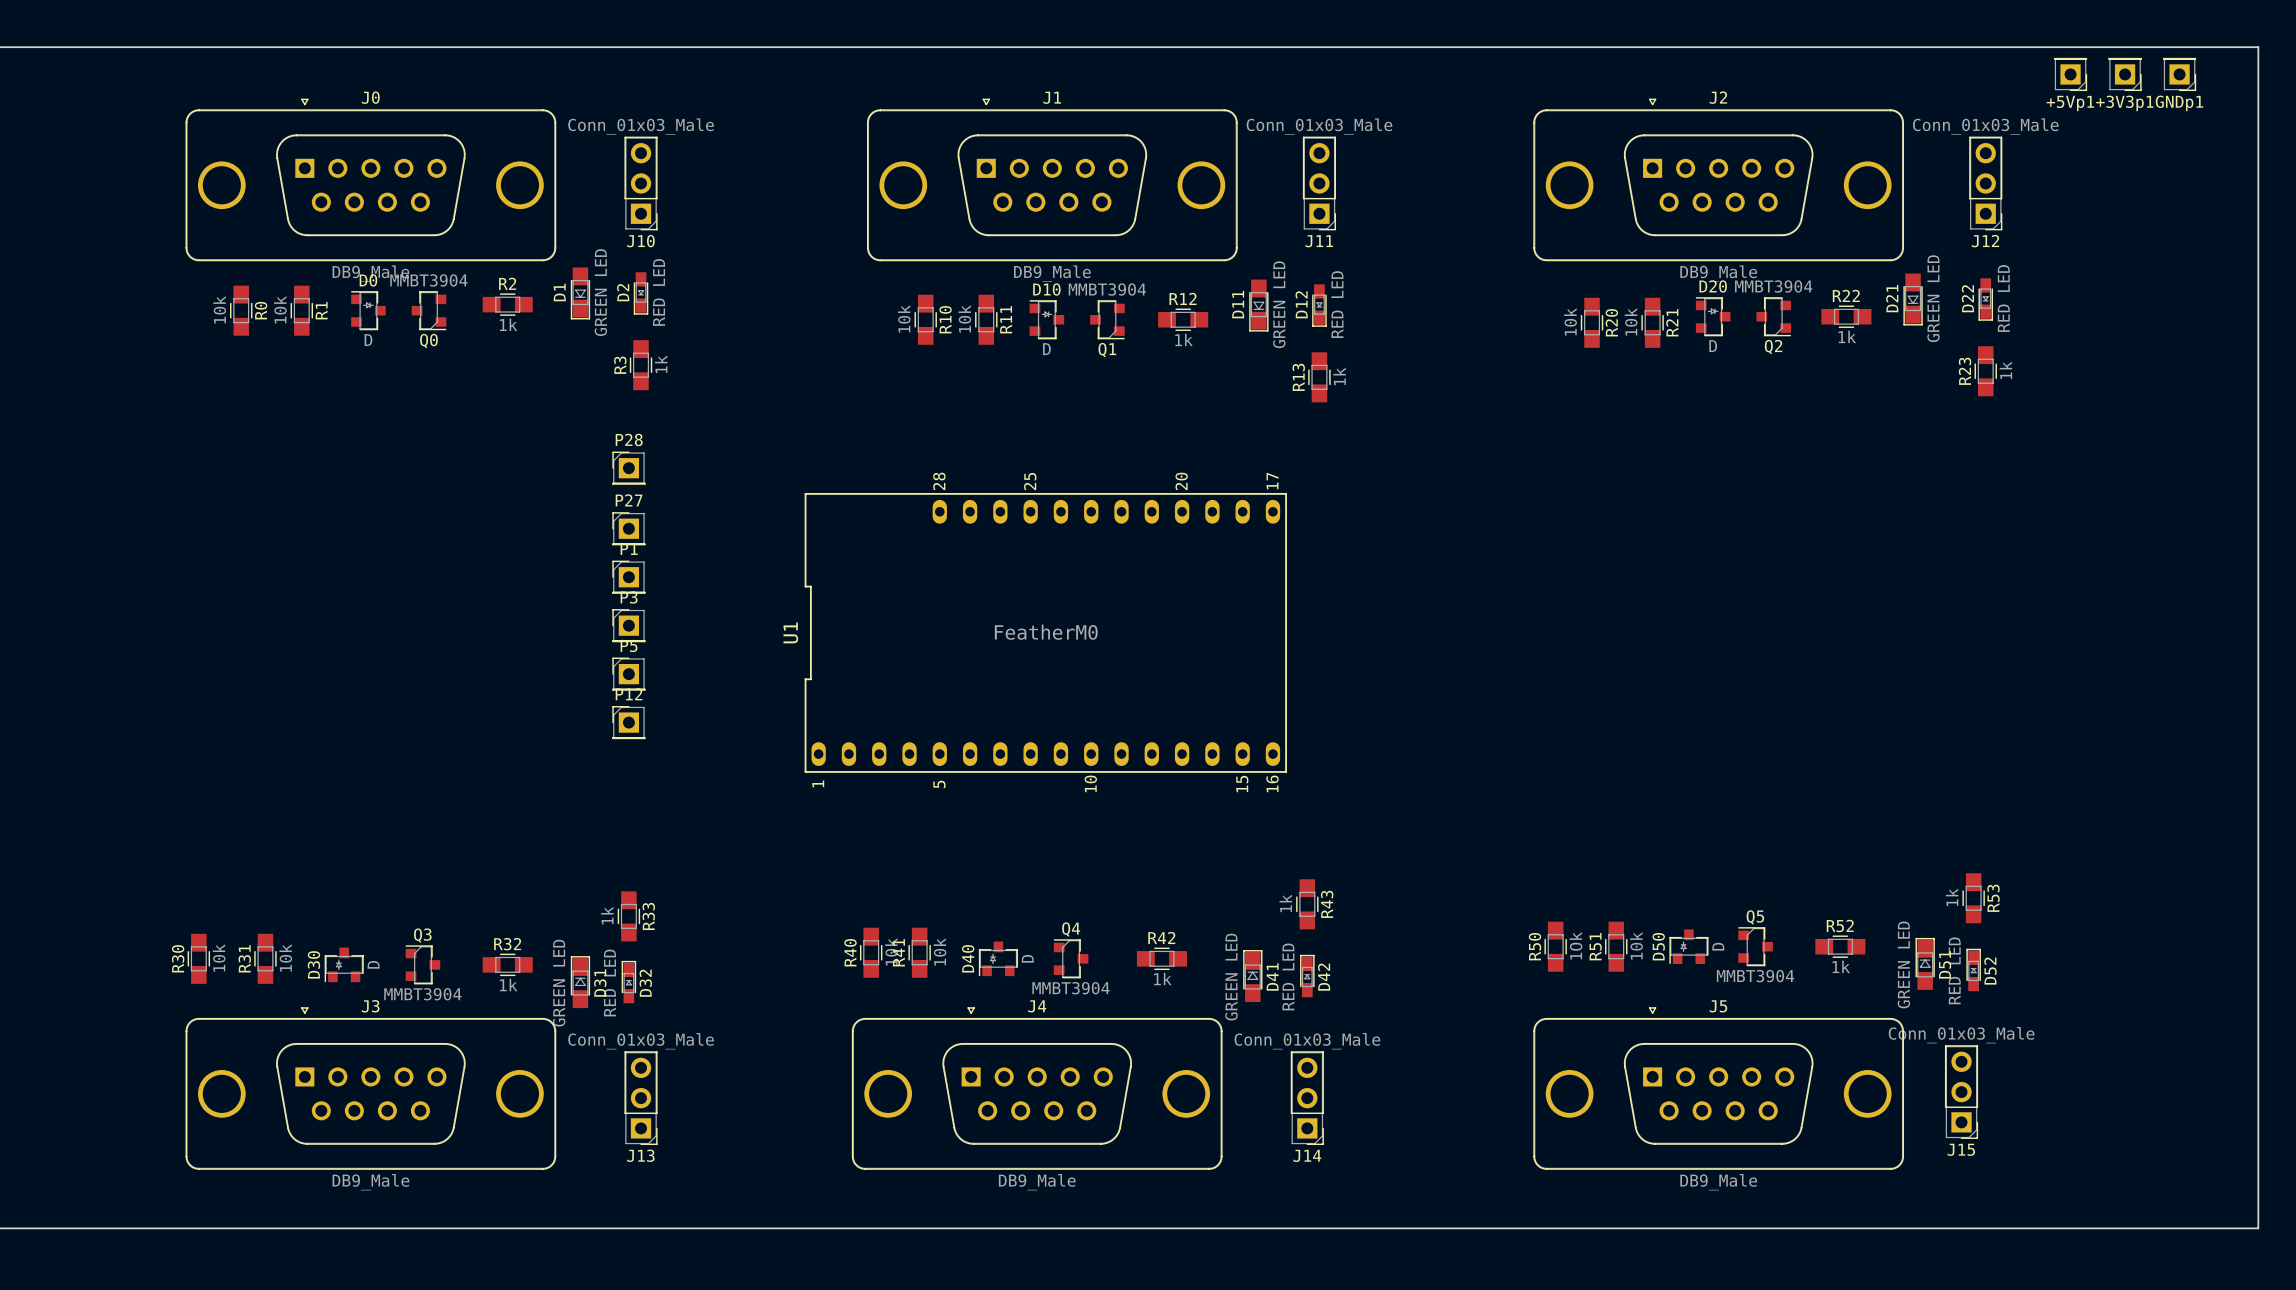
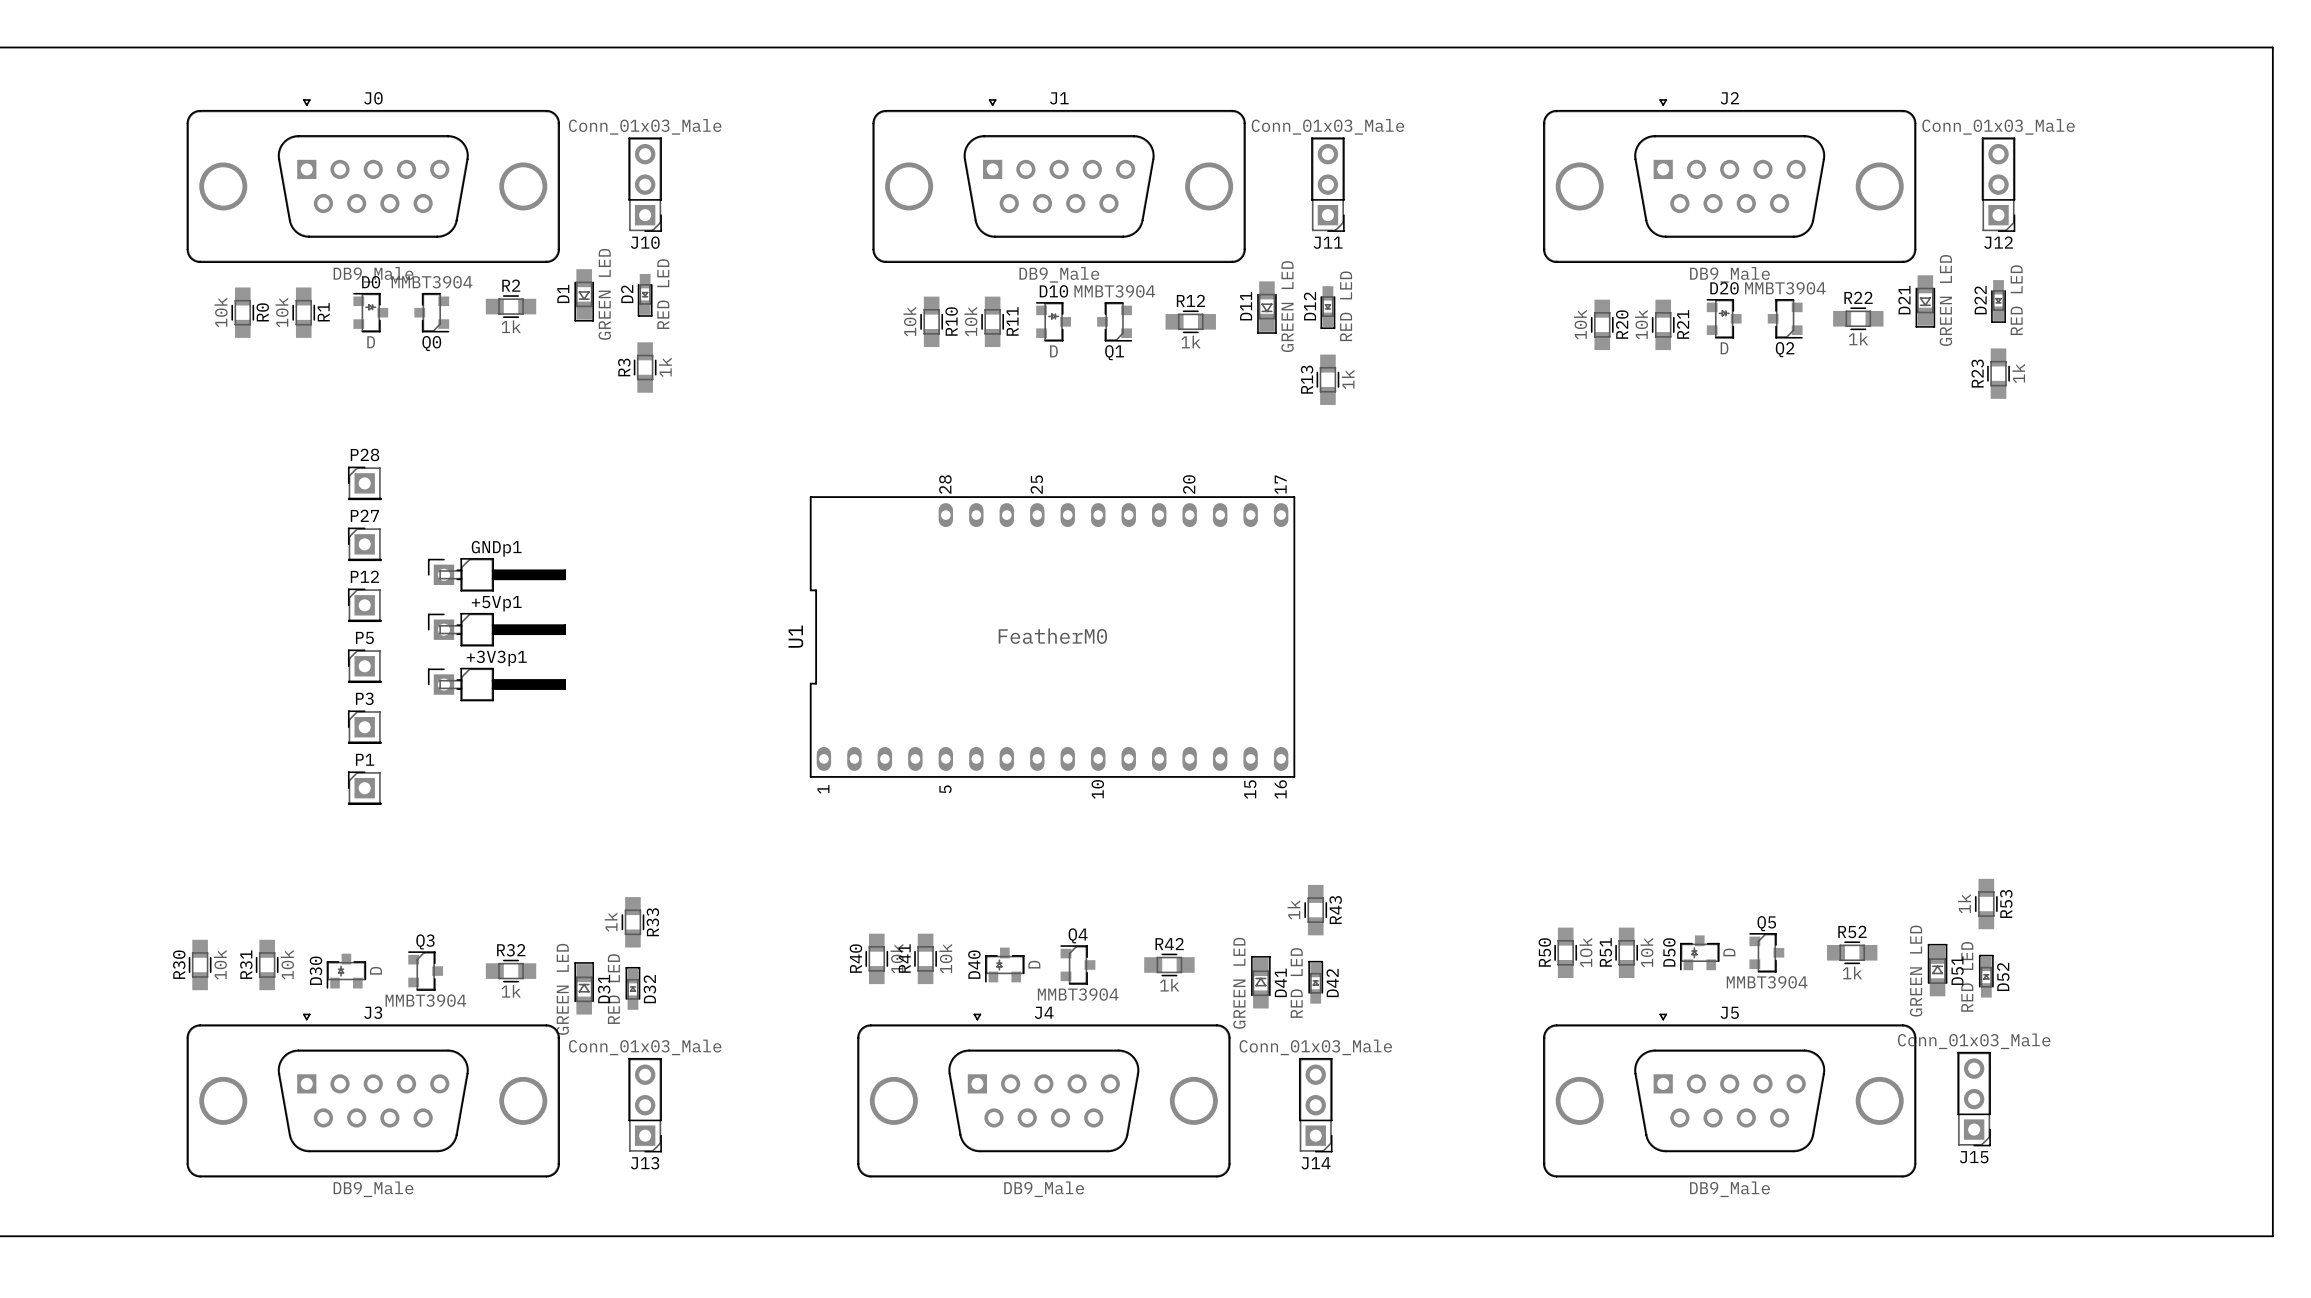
+5Vp1 footprint: [2053, 57, 2088, 92] -> [428, 613, 566, 647]
+3V3p1 footprint: [2108, 57, 2142, 92] -> [428, 667, 566, 702]
GNDp1 footprint: [2163, 57, 2197, 92] -> [428, 558, 566, 592]
+5Vp1 name position: +5Vp1 (2070, 103) -> +5Vp1 (496, 603)
+3V3p1 name position: +3V3p1 (2124, 103) -> +3V3p1 (496, 658)
GNDp1 name position: GNDp1 (2179, 103) -> GNDp1 (496, 548)
P28 position: (628, 468) -> (364, 483)
P27 position: (628, 528) -> (364, 544)
P1 position: (628, 577) -> (364, 788)
P3 position: (628, 625) -> (364, 727)
P5 position: (628, 674) -> (364, 666)
P12 position: (628, 722) -> (364, 605)

